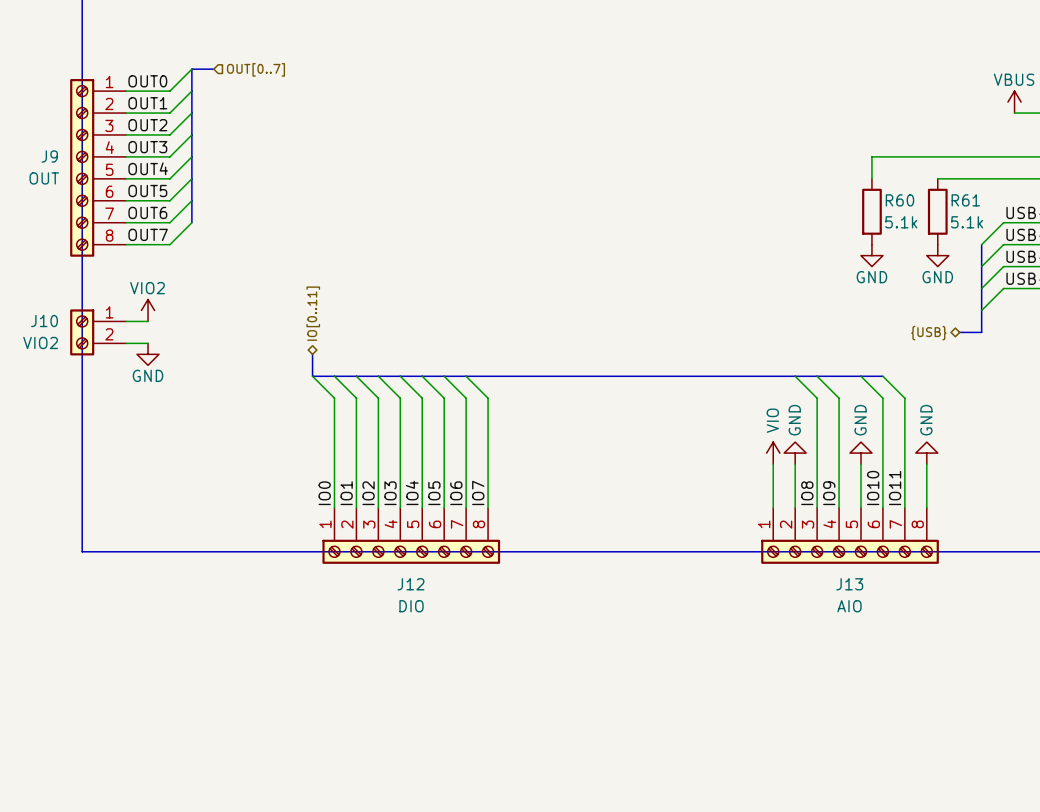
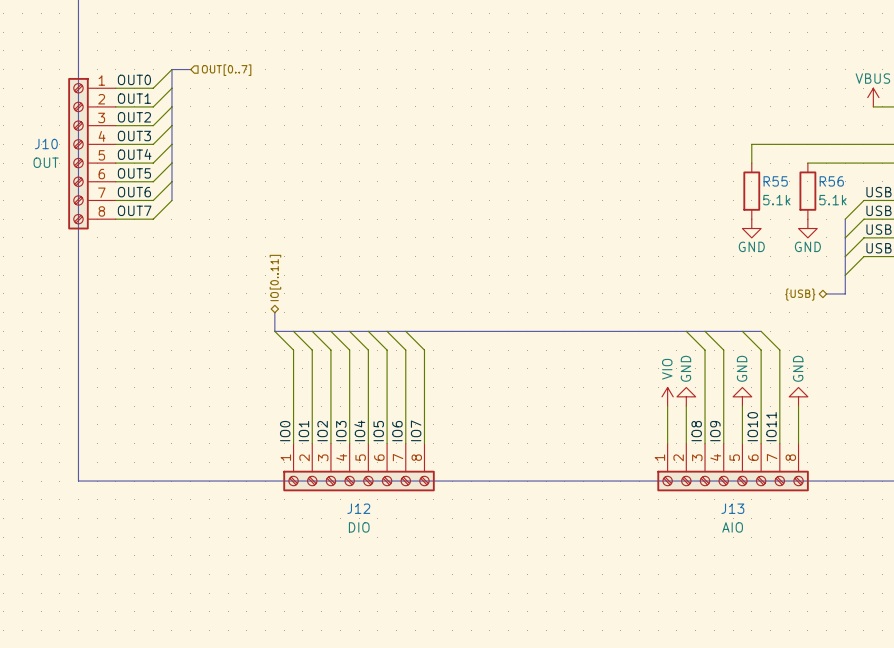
J9 name: J9 (49, 156) -> J10 (46, 144)
R60 name: R60 (899, 200) -> R55 (775, 181)
R61 name: R61 (965, 200) -> R56 (831, 181)
power symbol: VIO2 (148, 310) -> none
wire: (126, 321) (148, 321) -> none
J10: VIO2 (98, 332) -> none
wire: (126, 343) (148, 343) -> none
power symbol: GND (148, 354) -> none

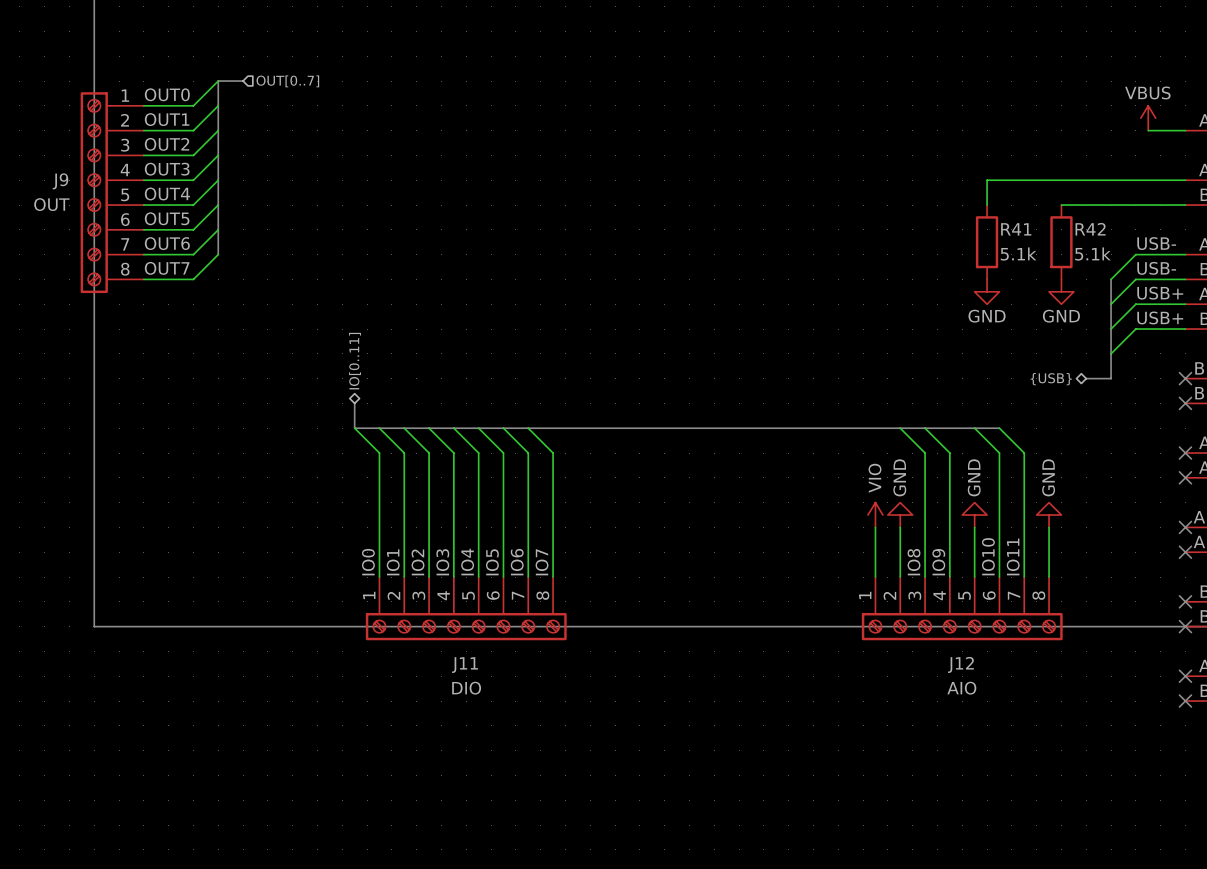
J10 name: J10 (46, 144) -> J9 (60, 181)
R55 name: R55 (775, 181) -> R41 (1016, 229)
R56 name: R56 (831, 181) -> R42 (1090, 229)
J12 name: J12 (358, 508) -> J11 (465, 665)
J13 name: J13 (732, 508) -> J12 (960, 664)

